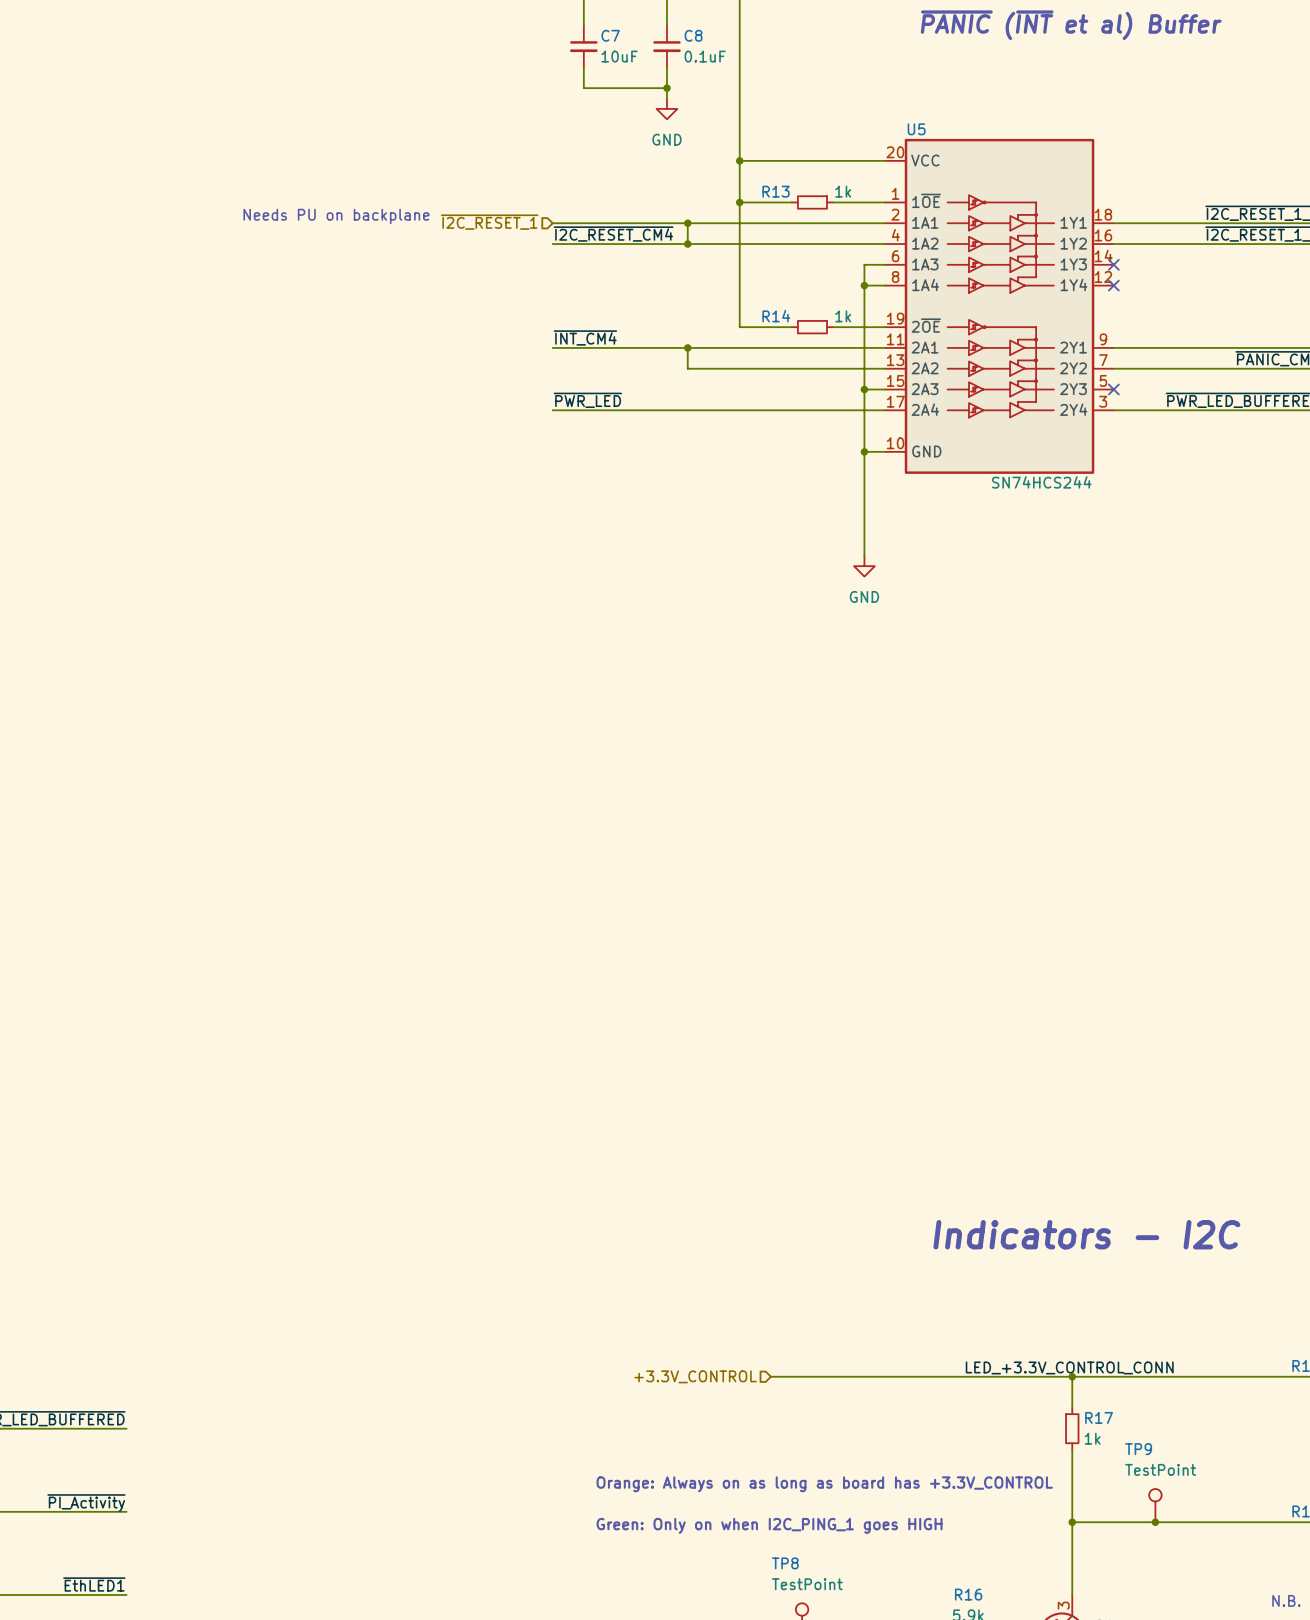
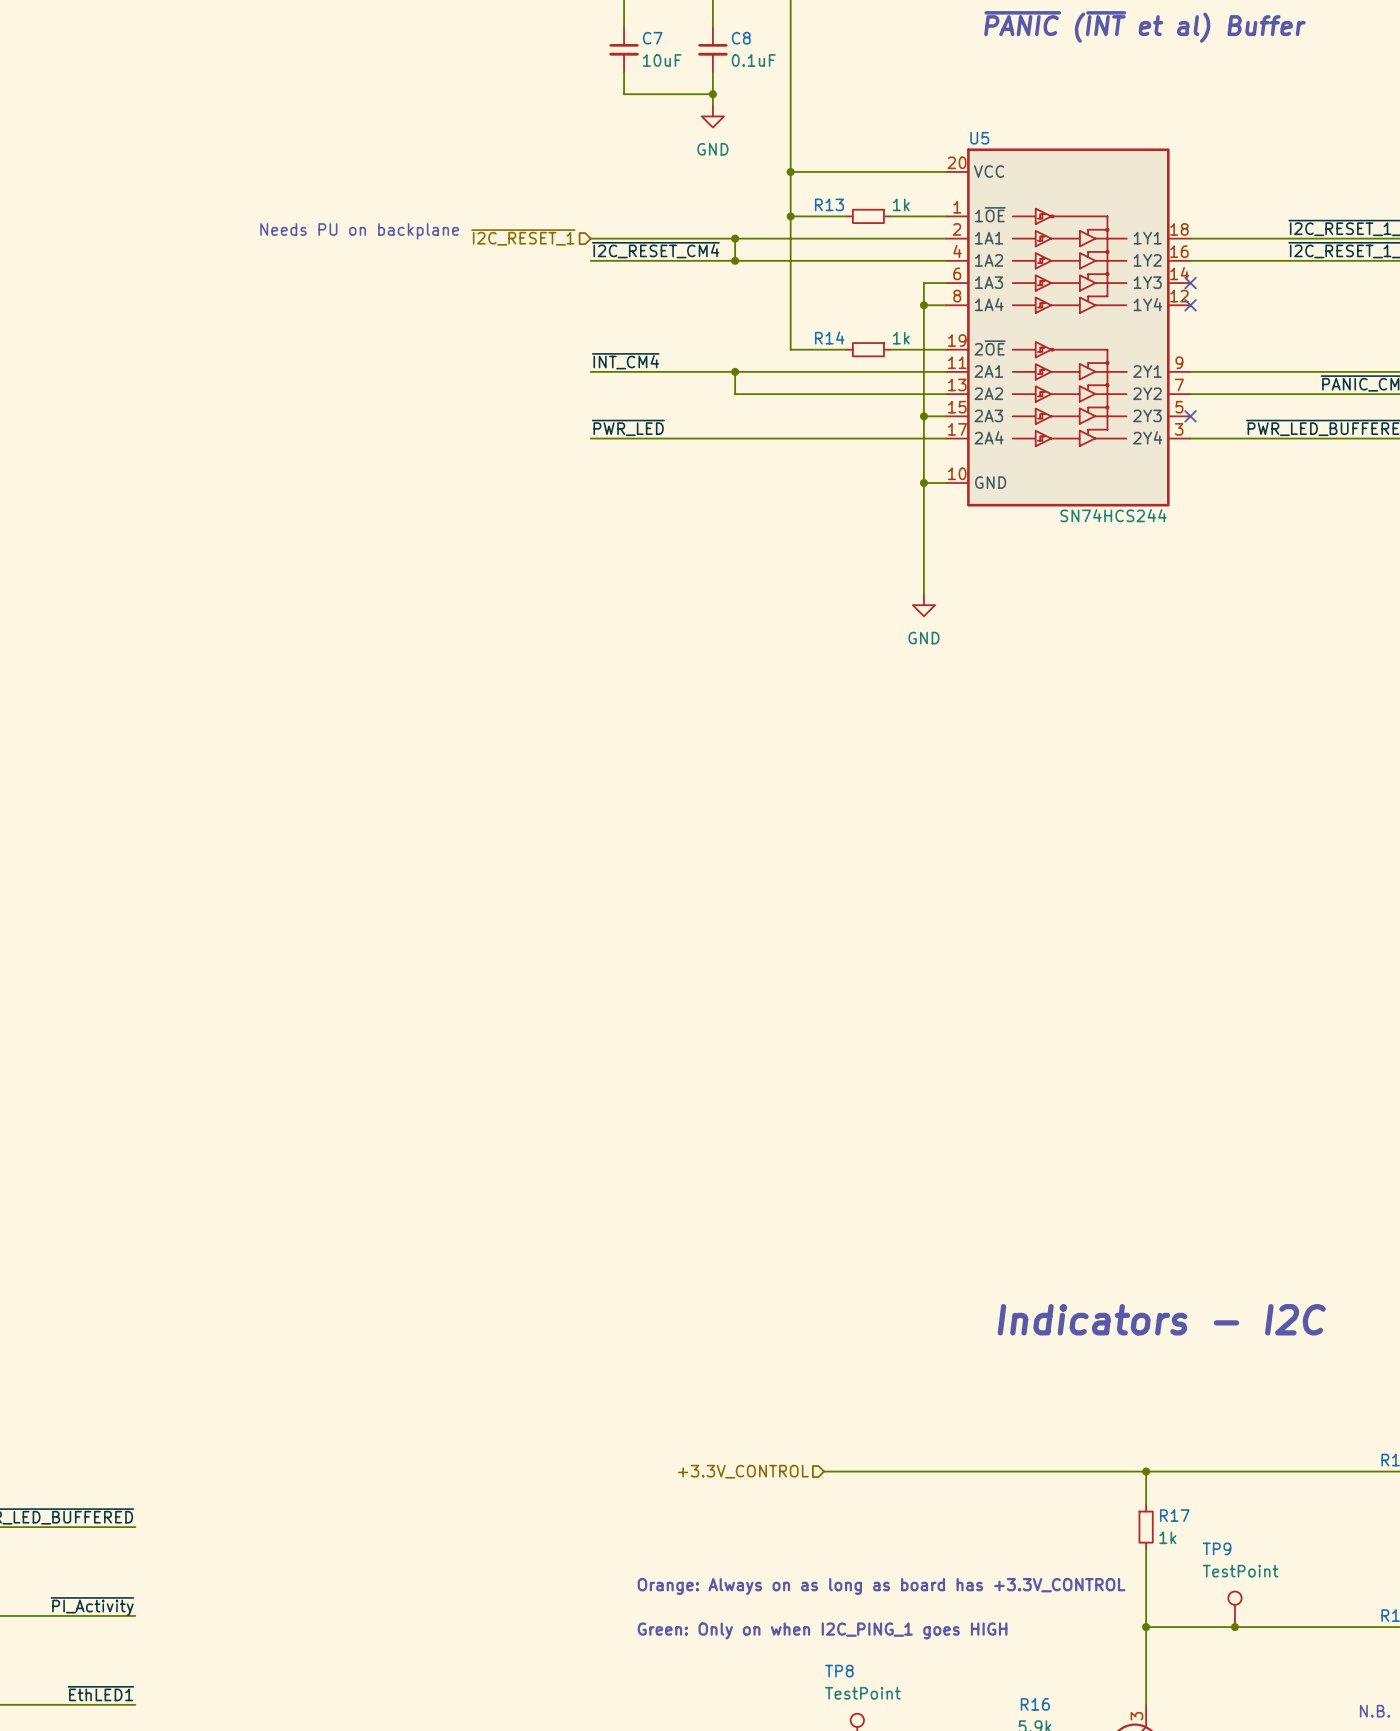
label: LED_+3.3V_CONTROL_CONN (1069, 1367) -> none

